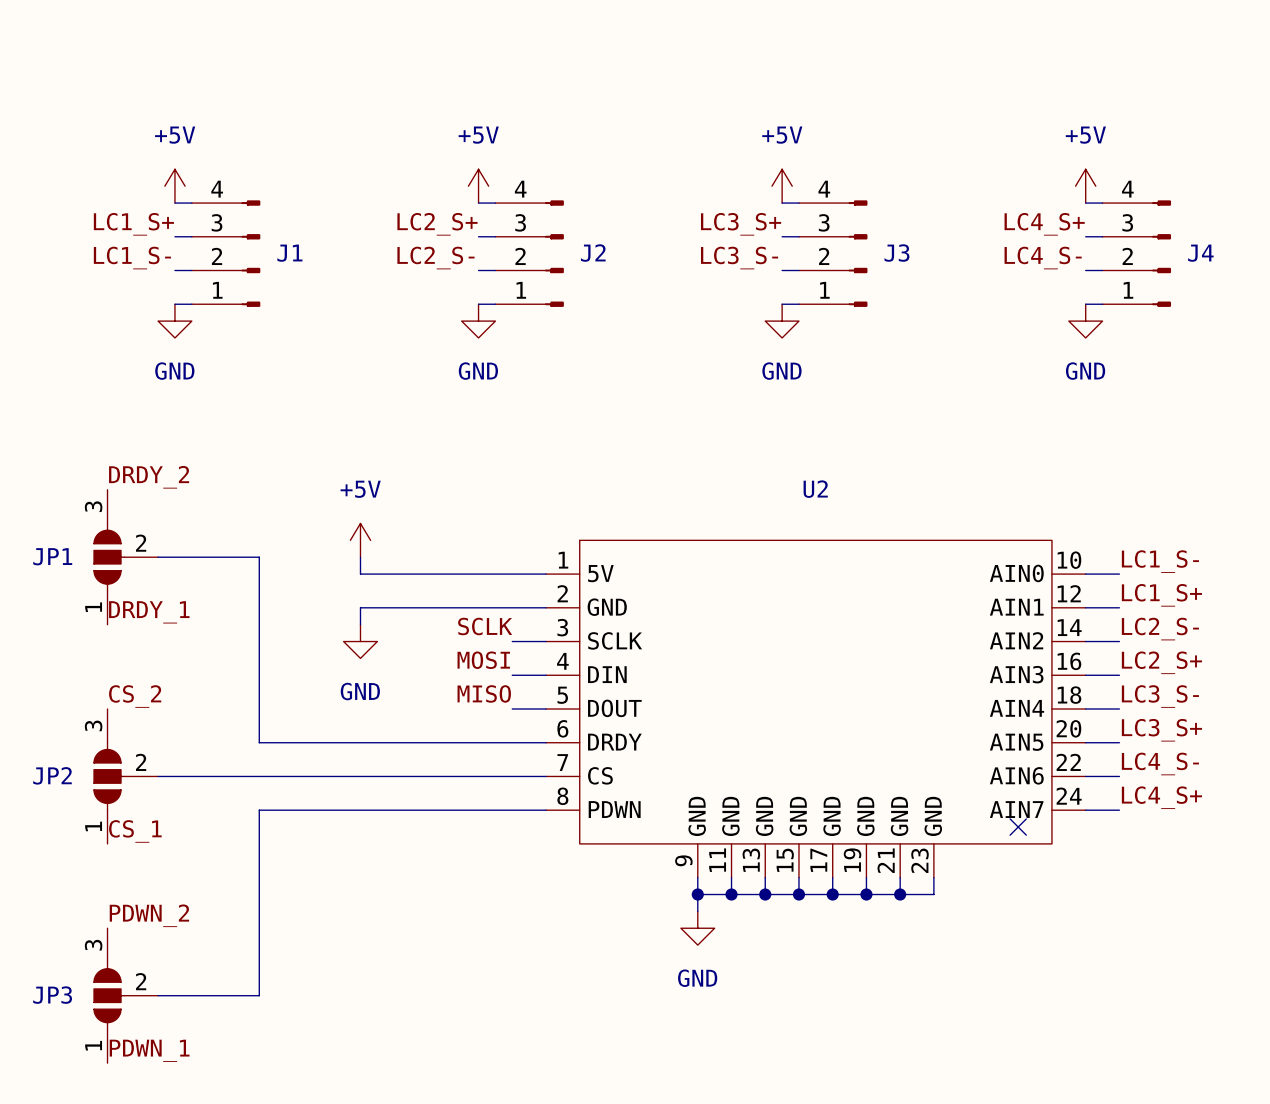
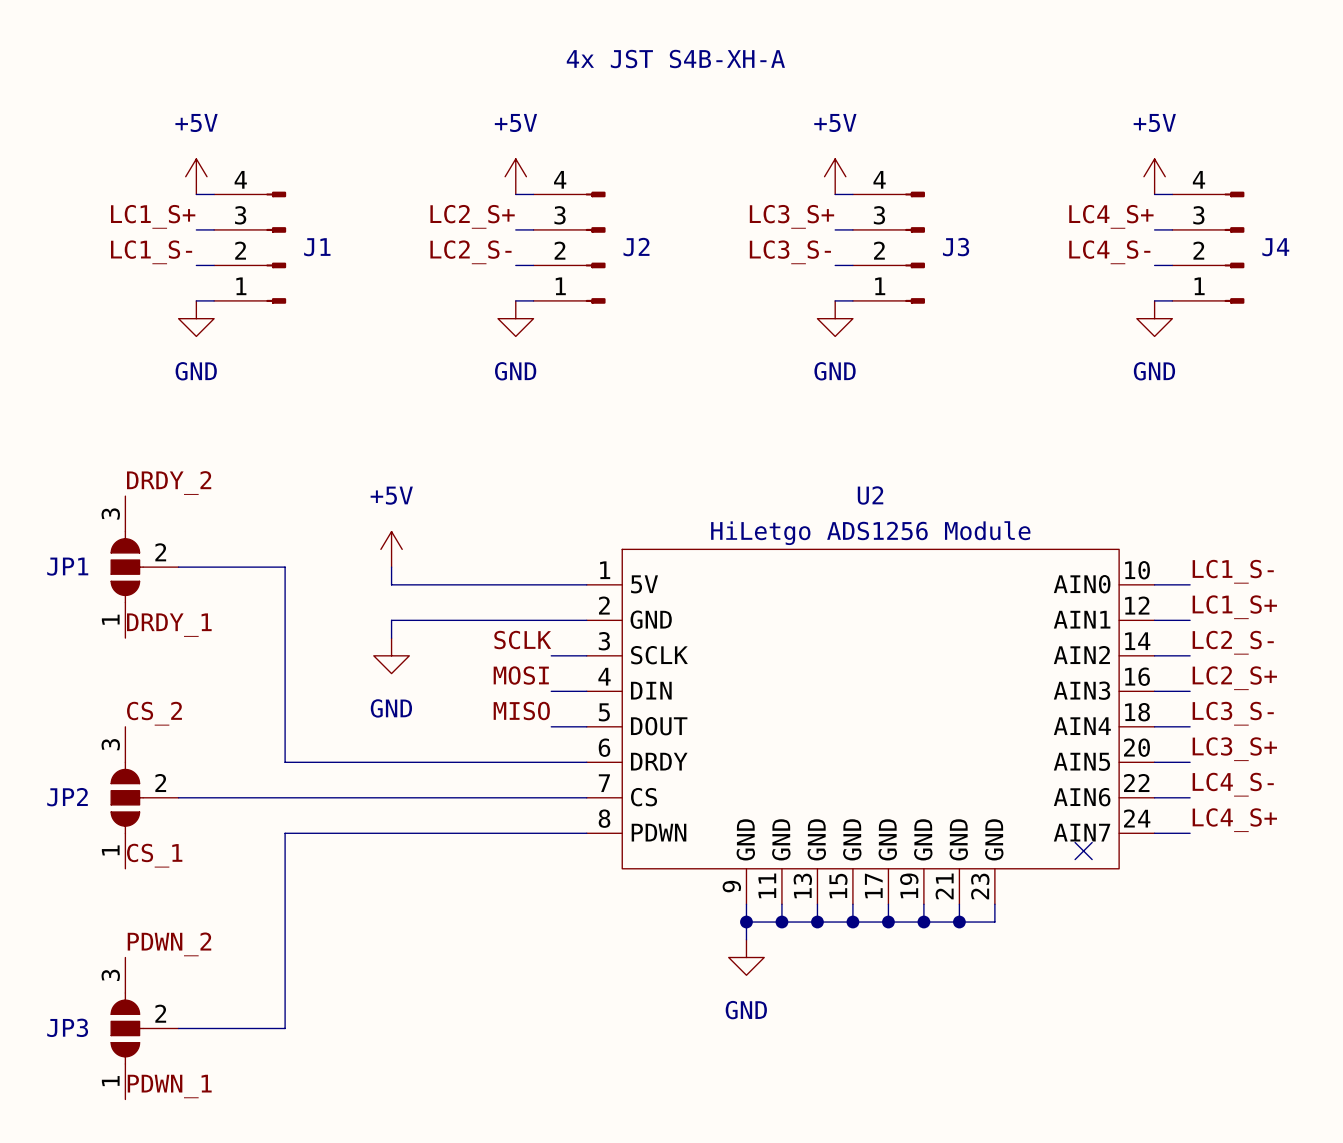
text: none -> 4x JST S4B-XH-A (675, 59)
U2 value: none -> HiLetgo ADS1256 Module (870, 533)

